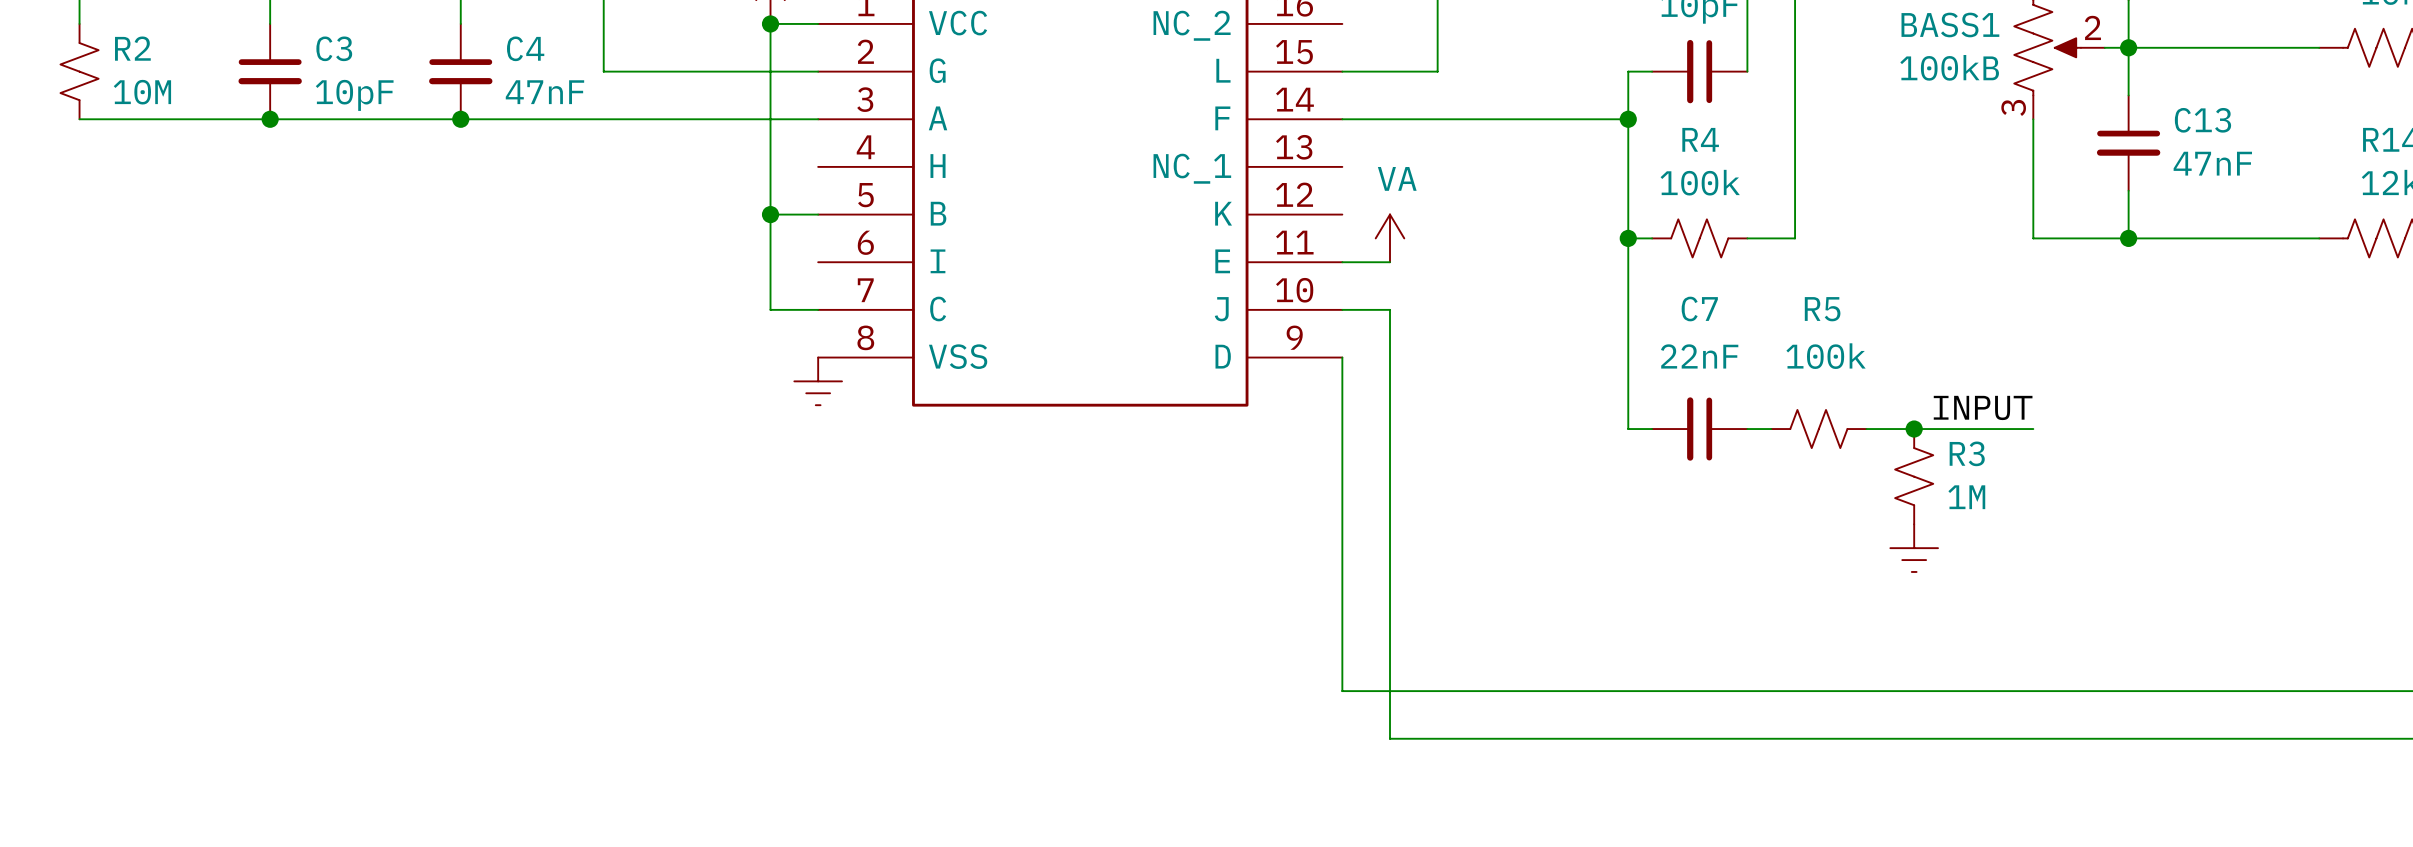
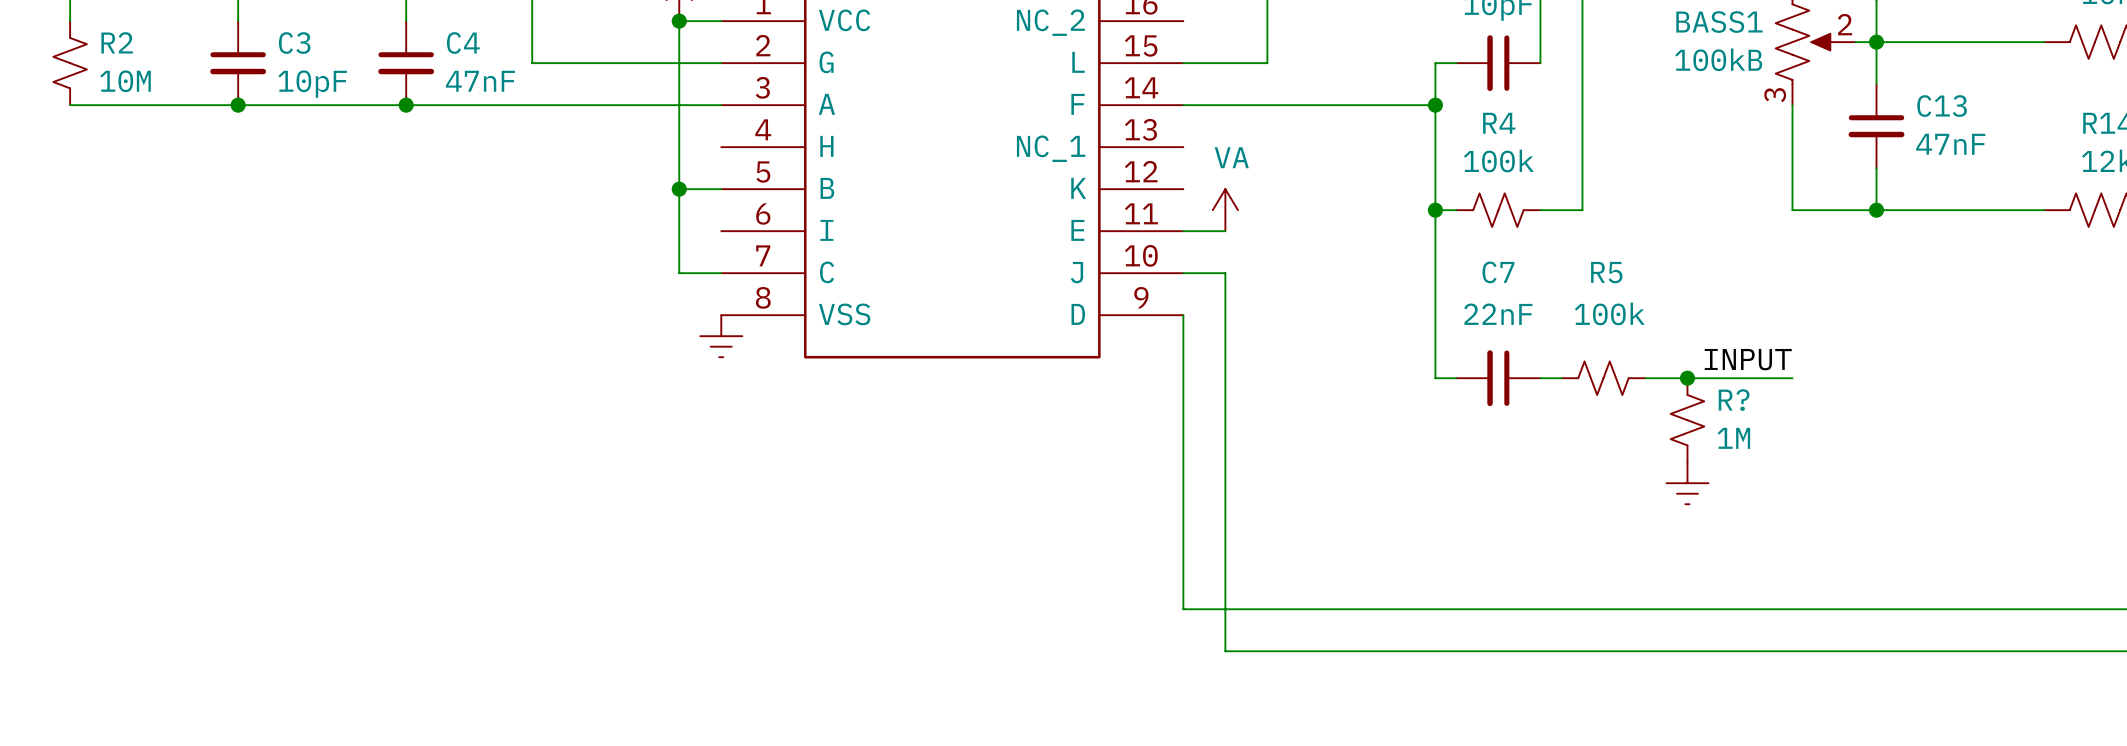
R3 name: R3 (1967, 453) -> R? (1734, 400)

